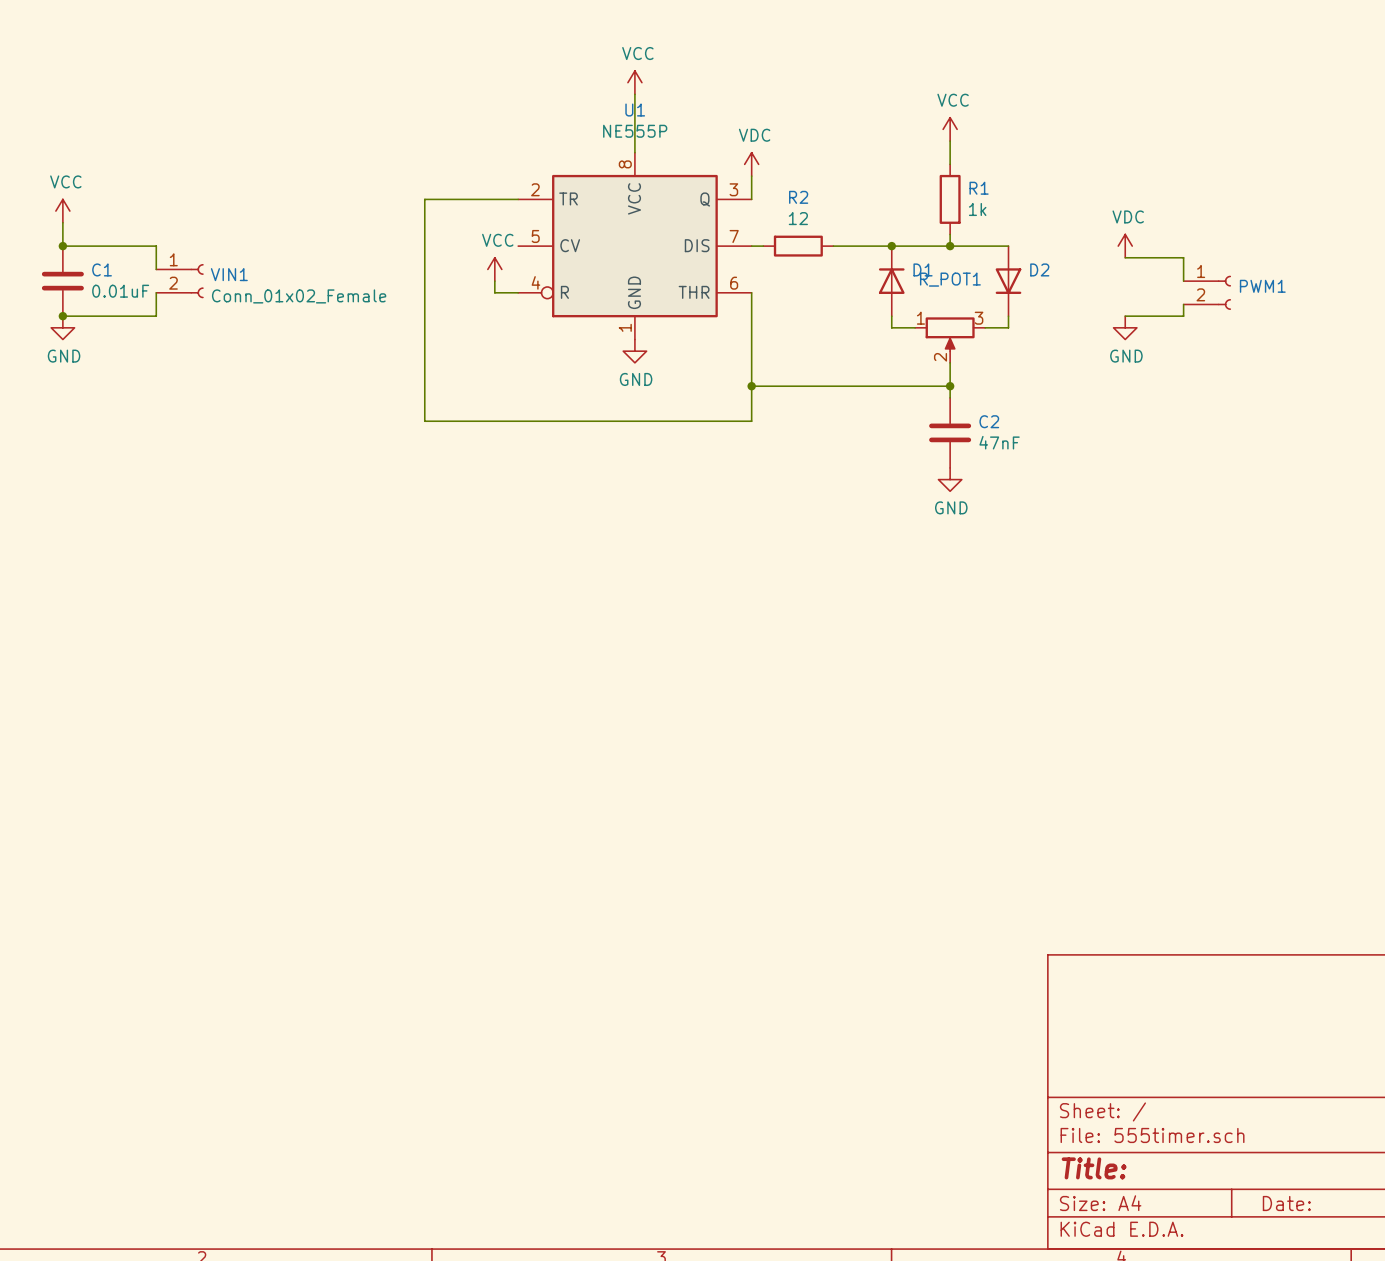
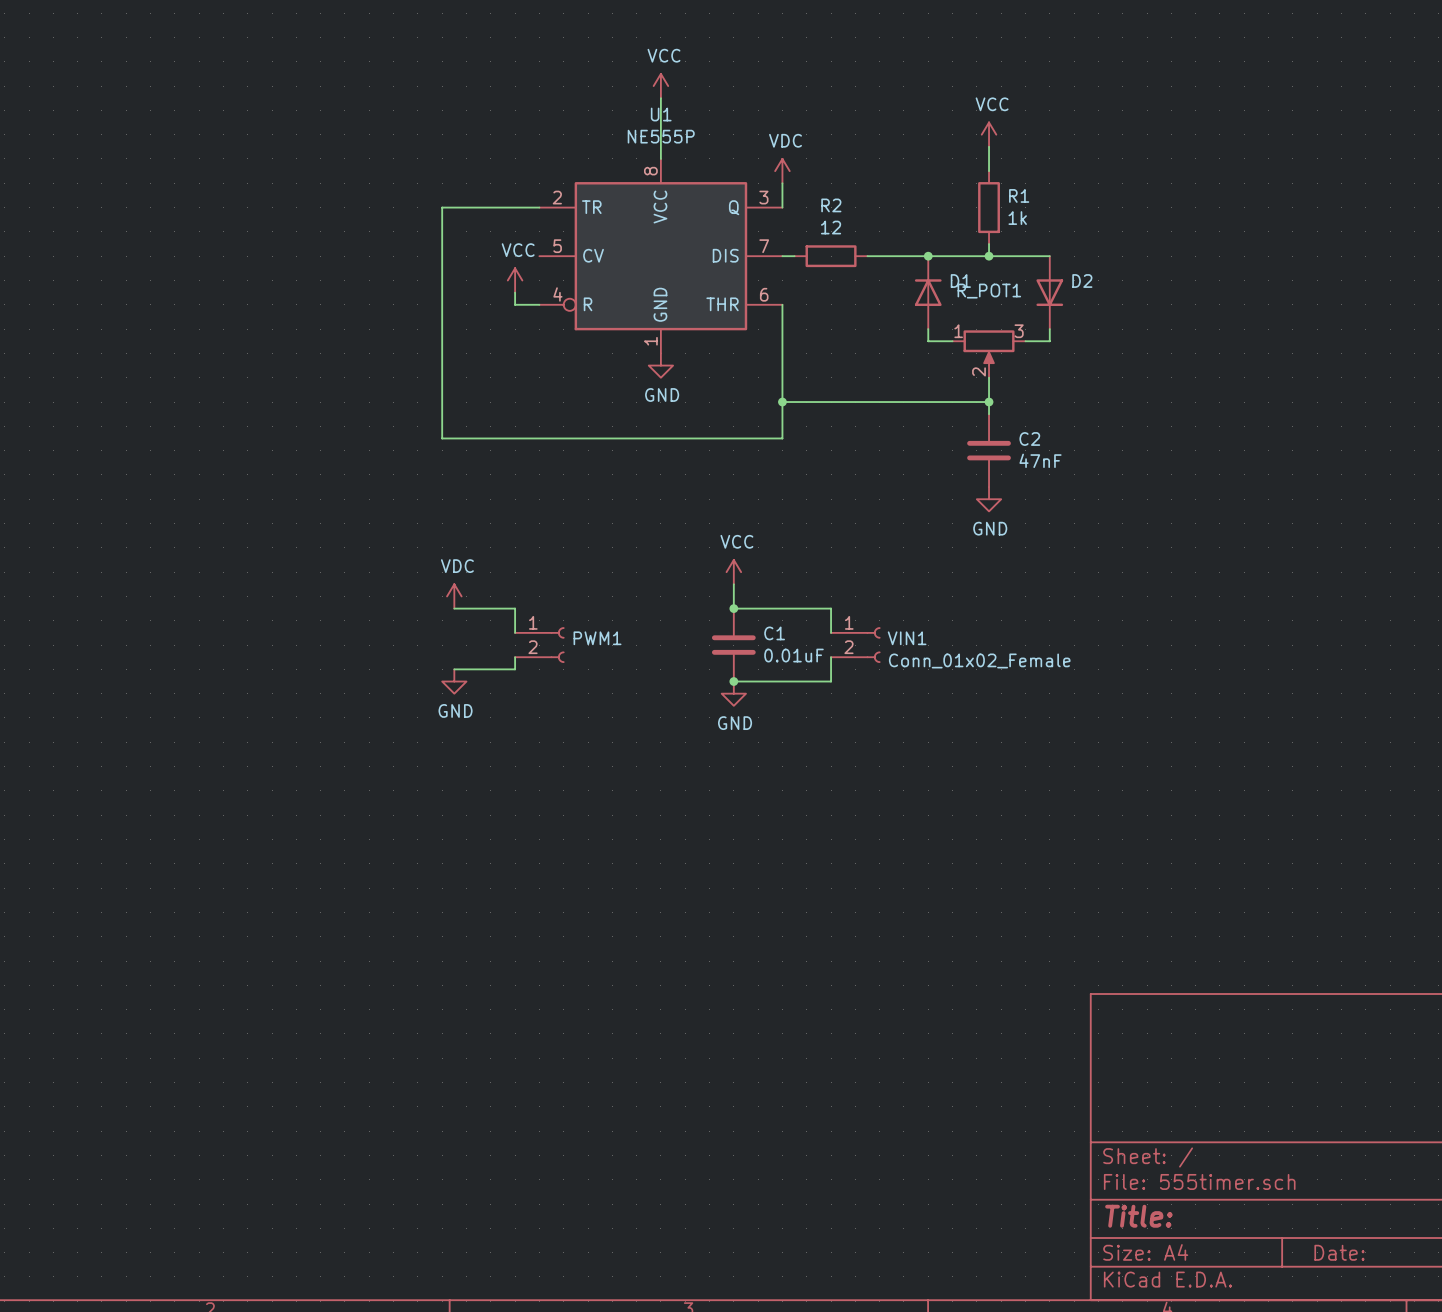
power symbol: VCC (62, 211) -> none
wire: (62, 222) (62, 246) (156, 246) (156, 269) -> none
junction: (62, 246) -> none
power symbol: VDC (1125, 246) -> none
wire: (1125, 257) (1183, 257) (1183, 281) -> none
C1 position: (62, 281) -> (733, 645)
VIN1 position: (179, 281) -> (855, 645)
wire: (156, 292) (156, 316) (62, 316) -> none
PWM1 position: (1207, 292) -> (539, 645)
wire: (1183, 304) (1183, 316) (1125, 316) -> none
junction: (62, 316) -> none
power symbol: GND (62, 327) -> none
power symbol: GND (1125, 327) -> none
power symbol: none -> VCC (733, 572)
wire: none -> (733, 584) (733, 608) (831, 608) (831, 632)
power symbol: none -> VDC (454, 596)
wire: none -> (454, 608) (515, 608) (515, 632)
junction: none -> (733, 608)
wire: none -> (515, 657) (515, 669) (454, 669)
wire: none -> (831, 657) (831, 681) (733, 681)
power symbol: none -> GND (454, 681)
junction: none -> (733, 681)
power symbol: none -> GND (733, 693)

